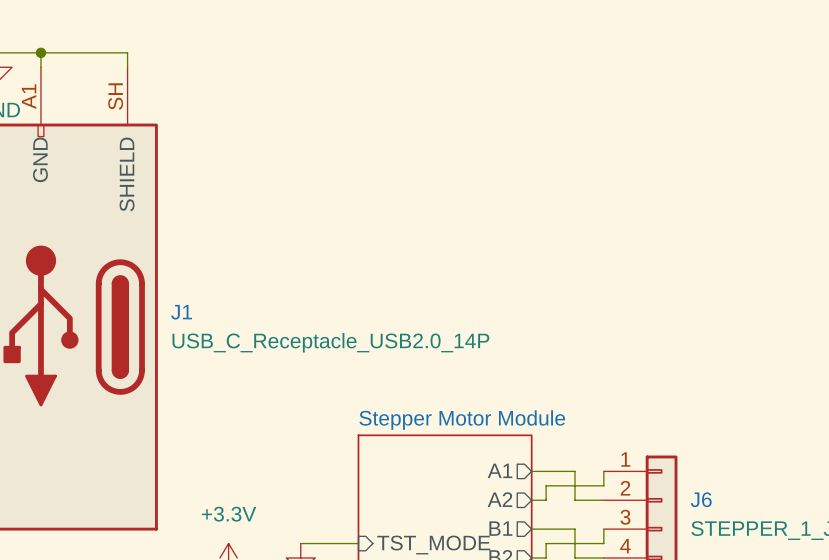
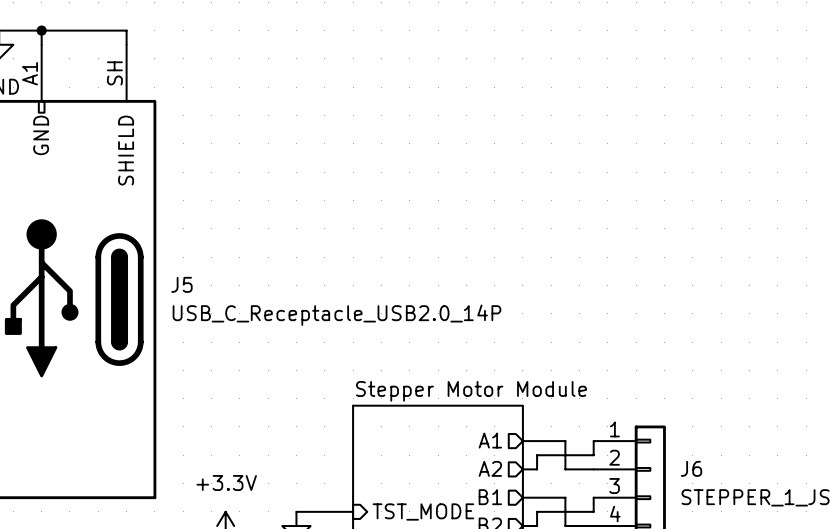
J1 name: J1 (181, 312) -> J5 (181, 284)

